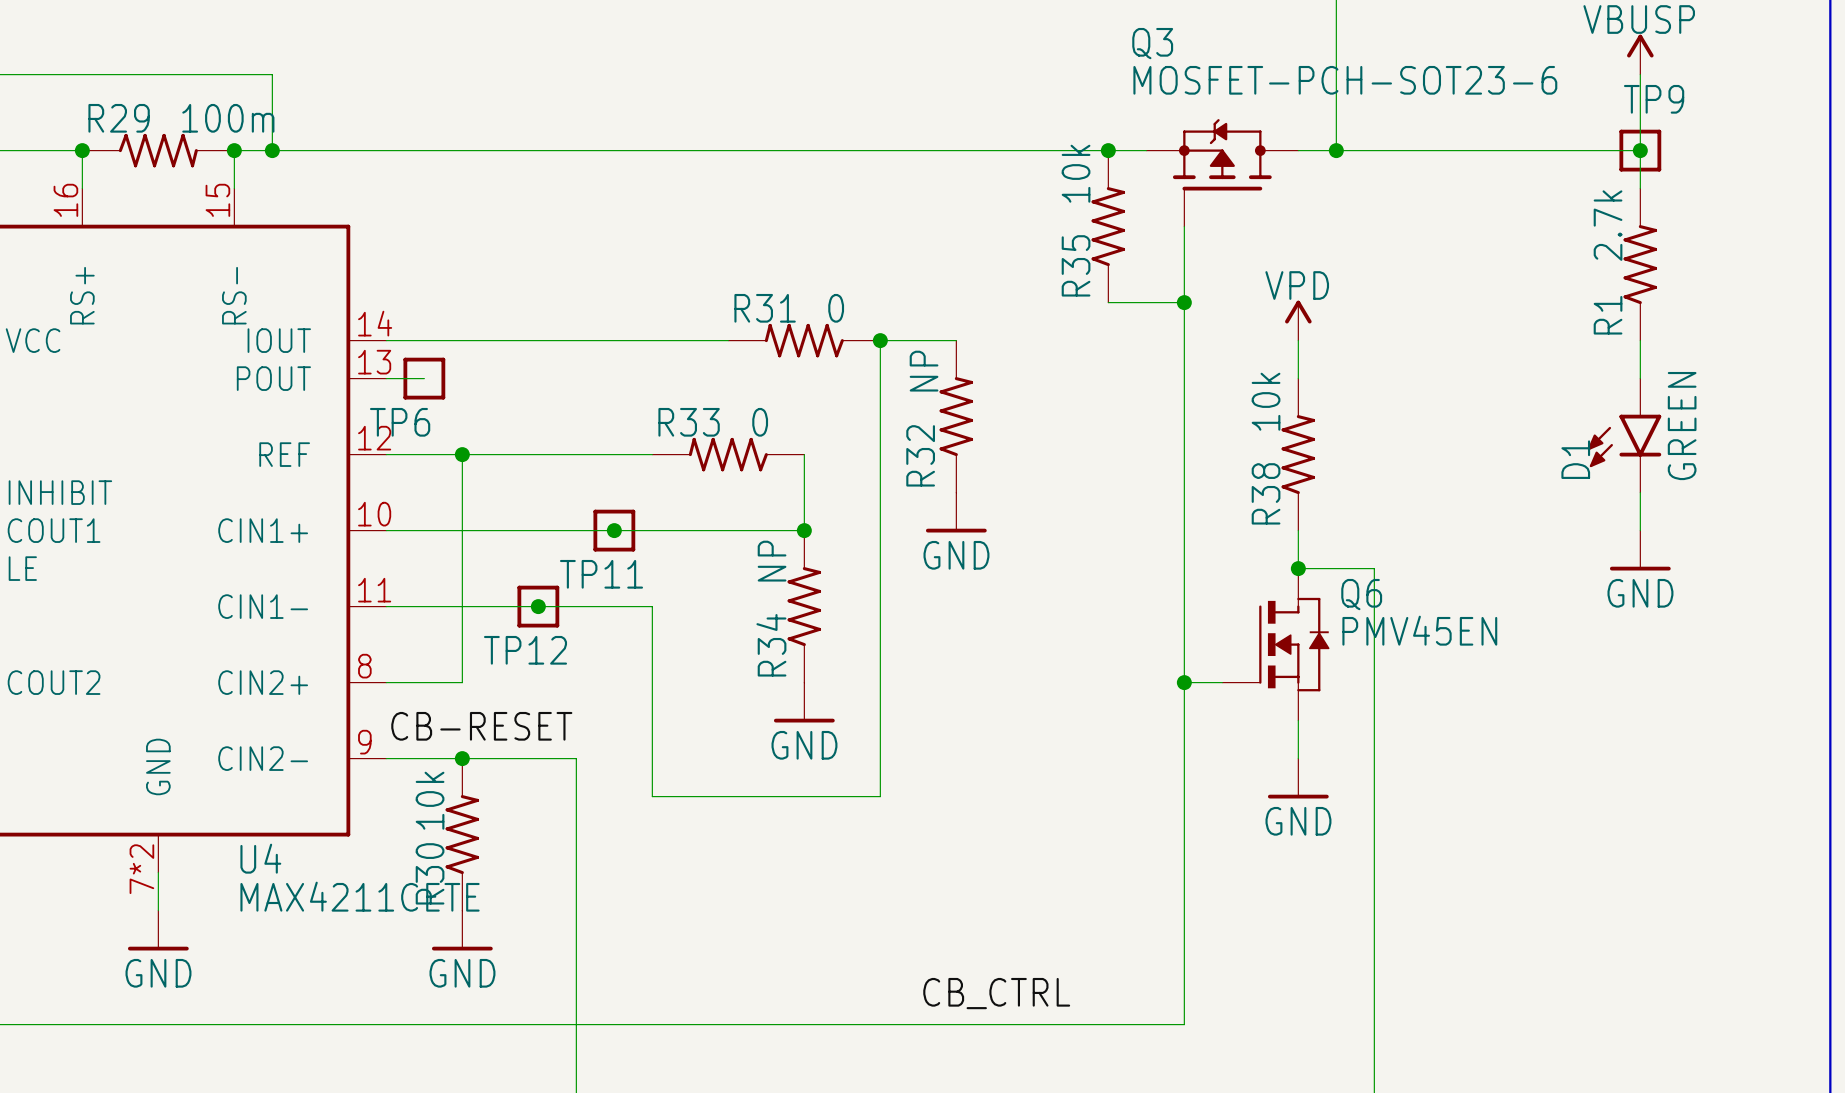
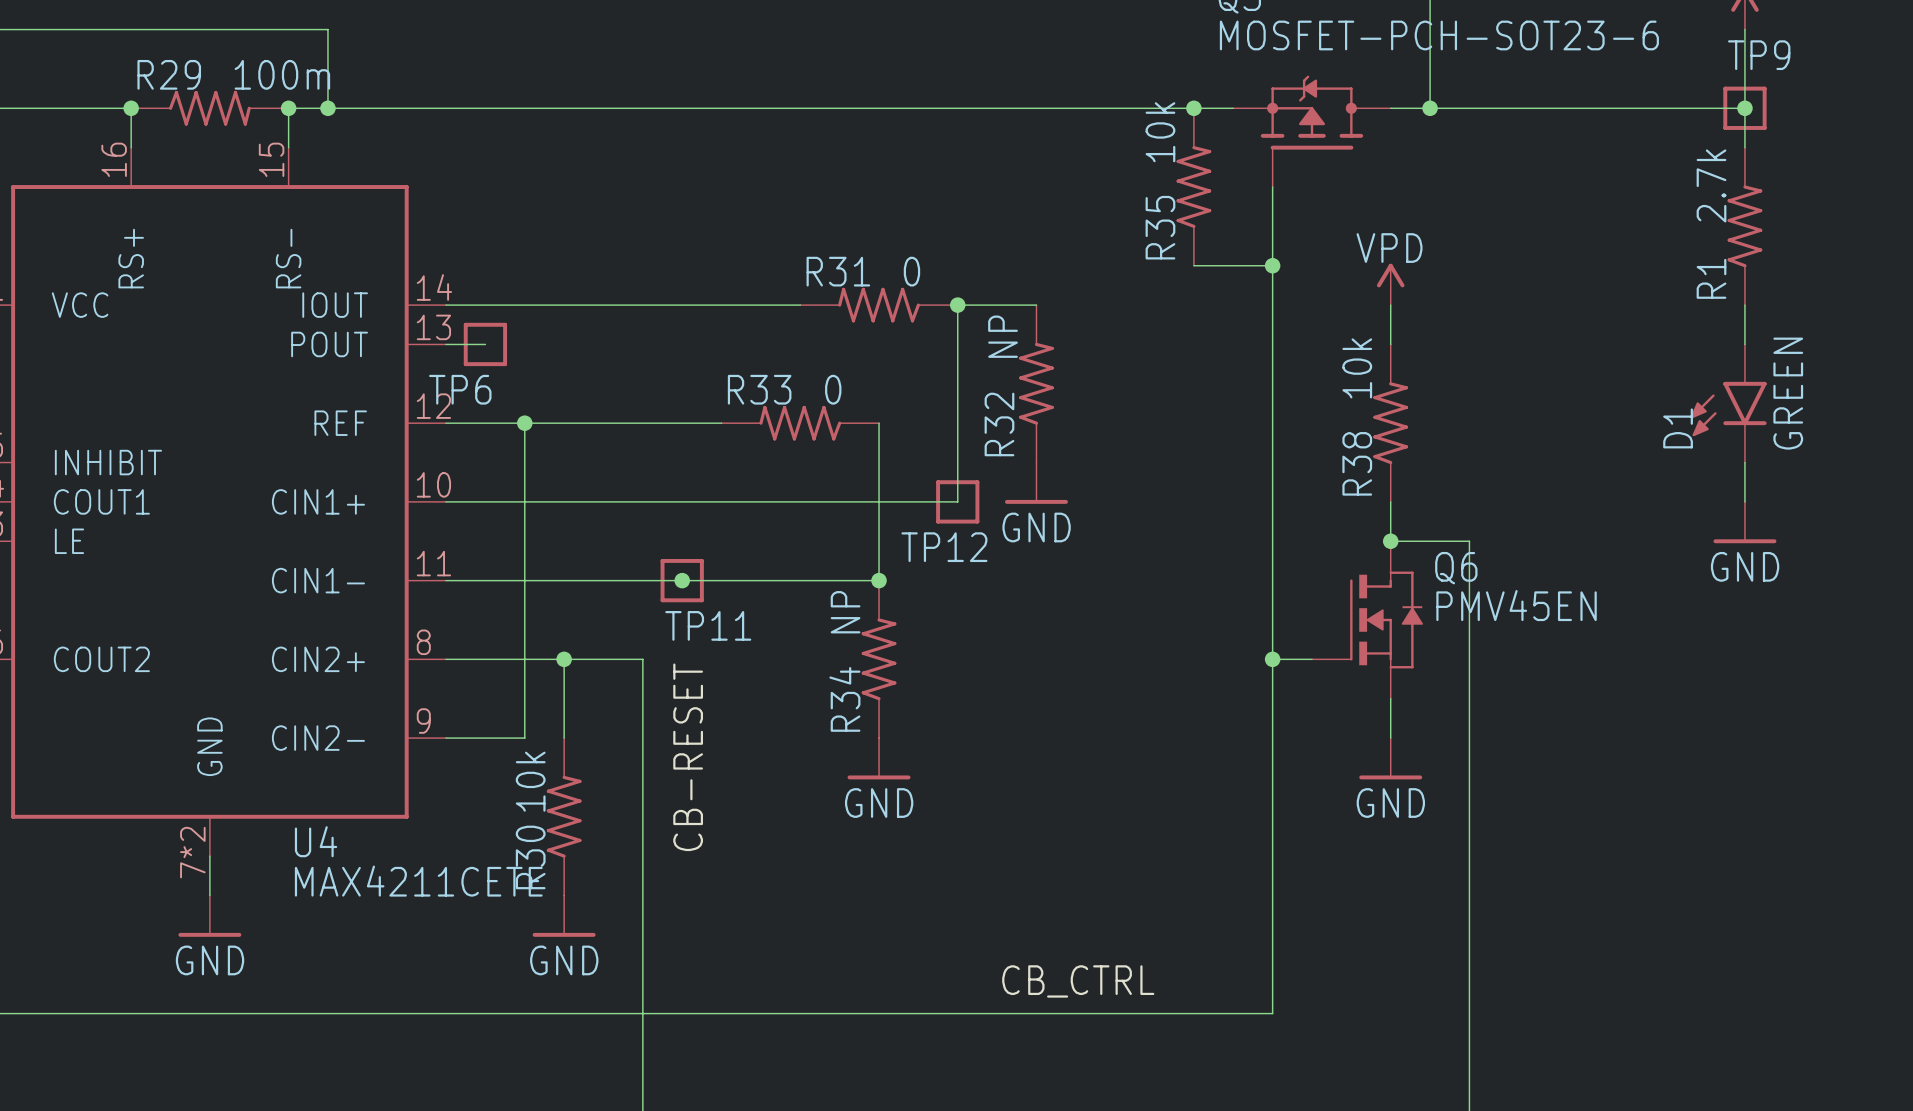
TP11 position: (614, 530) -> (682, 580)
junction: (614, 530) -> none
junction position: (804, 530) -> (879, 580)
wire: (880, 530) (880, 796) (652, 796) (652, 606) -> (957, 501) (879, 501) (879, 580) (721, 580)
TP11 name position: TP11 (601, 574) -> TP11 (708, 625)
TP12 position: (538, 606) -> (957, 501)
junction: (538, 606) -> none
junction: none -> (682, 580)
R34 position: (804, 606) -> (879, 659)
wire: none -> (564, 659) (564, 738)
junction: none -> (564, 659)
power symbol position: GND (804, 702) -> GND (879, 758)
label rotation: 0° (481, 726) -> 90° counterclockwise (688, 757)
wire: (462, 758) (576, 758) -> (524, 738) (524, 659) (642, 659) (642, 738)
junction: (462, 758) -> none
R30 position: (462, 834) -> (564, 816)
power symbol position: GND (462, 930) -> GND (564, 916)

